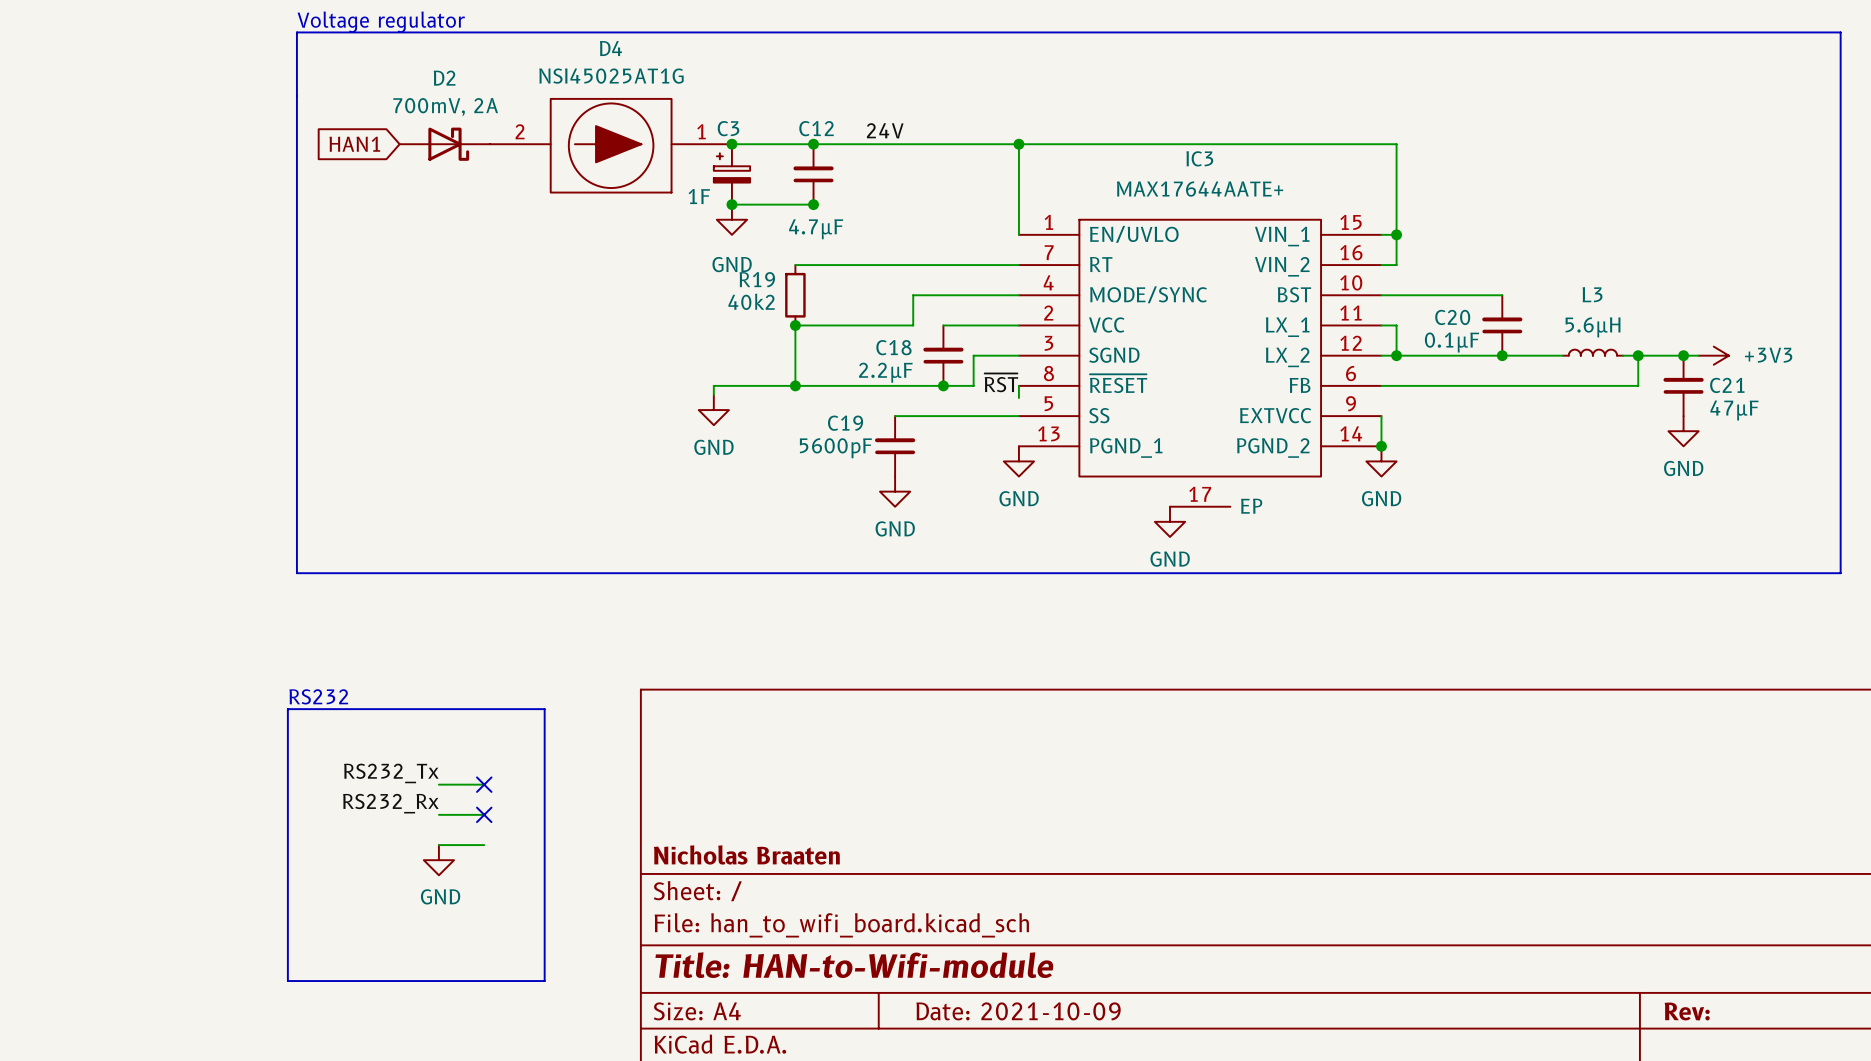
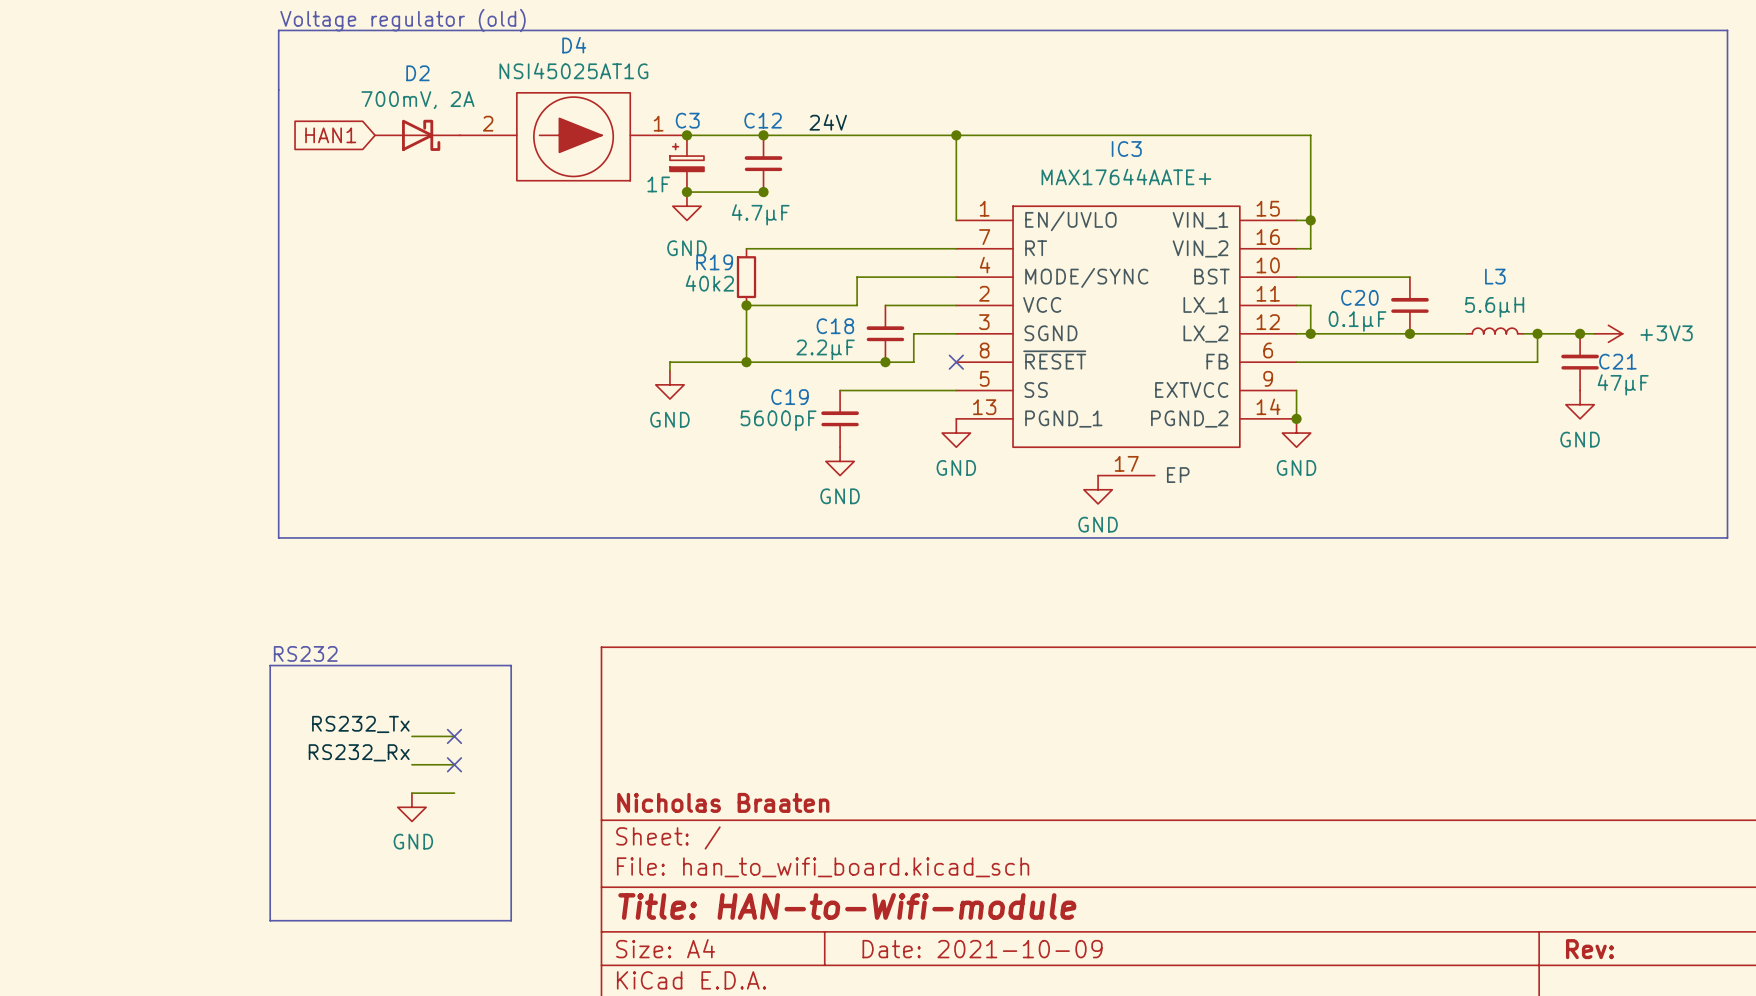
text: Voltage regulator (381, 22) -> Voltage regulator (old) (403, 20)
label: ~{RST} (1001, 382) -> none
wire: (1018, 385) (1018, 397) -> none
no-connect mark: none -> (956, 362)

